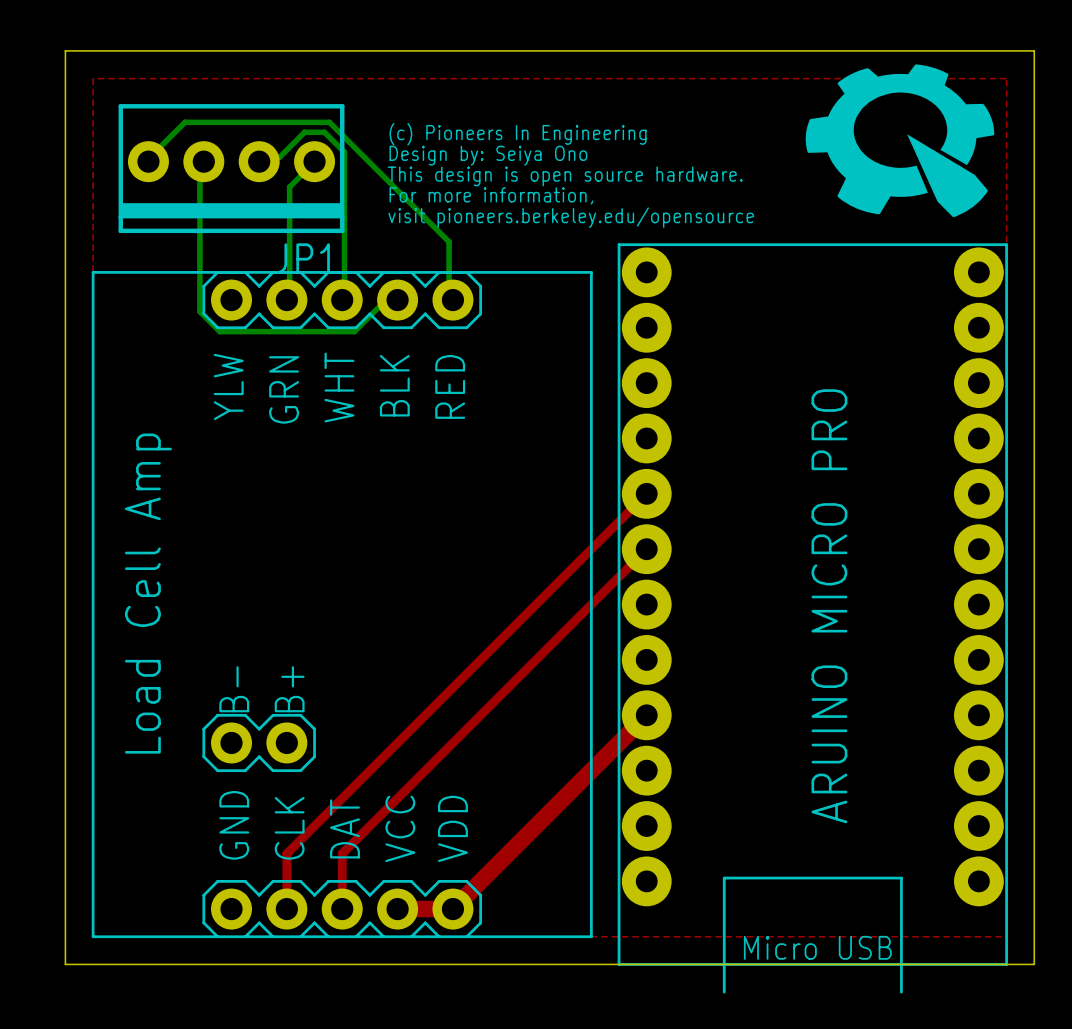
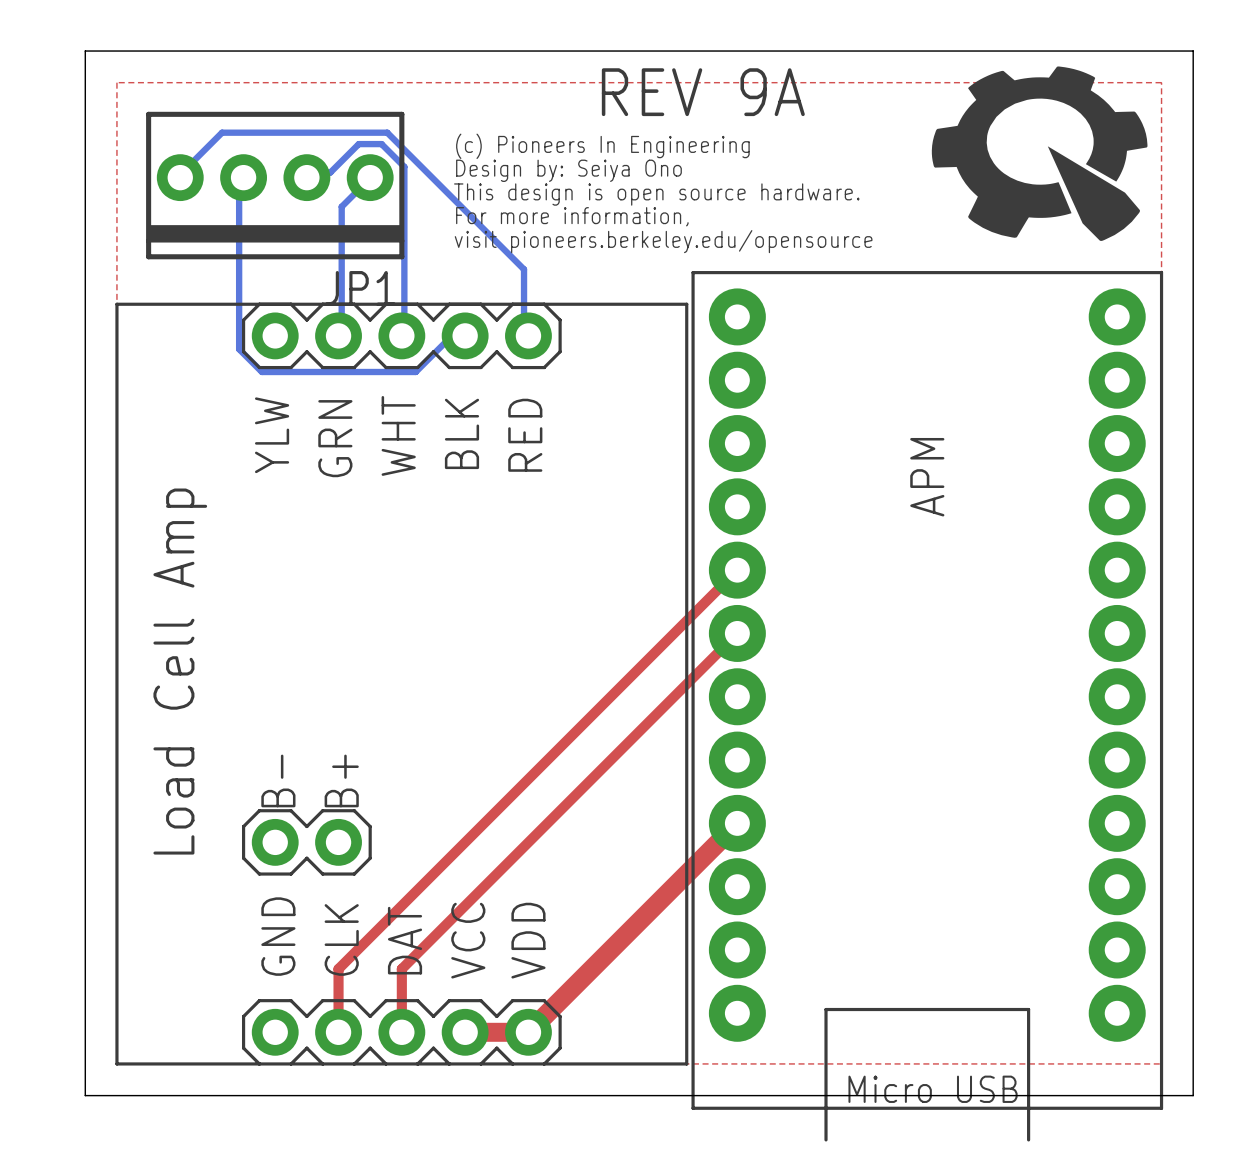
text: none -> REV 9A (703, 92)
part: (812, 618) -> none
APM: none -> (927, 706)

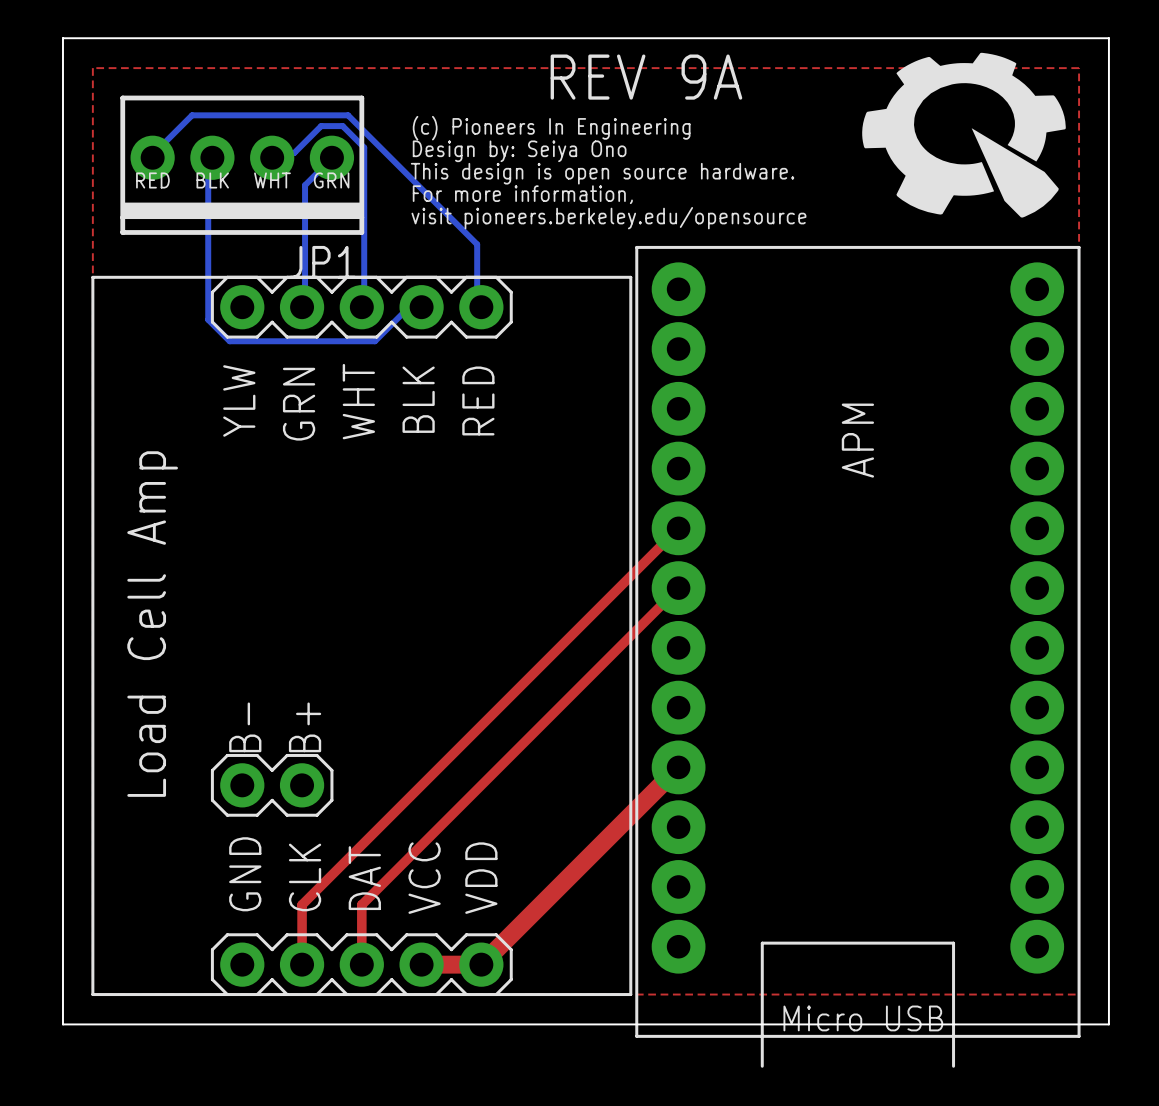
text: none -> RED (152, 180)
text: none -> BLK (212, 180)
text: none -> WHT (272, 180)
text: none -> GRN (331, 180)

